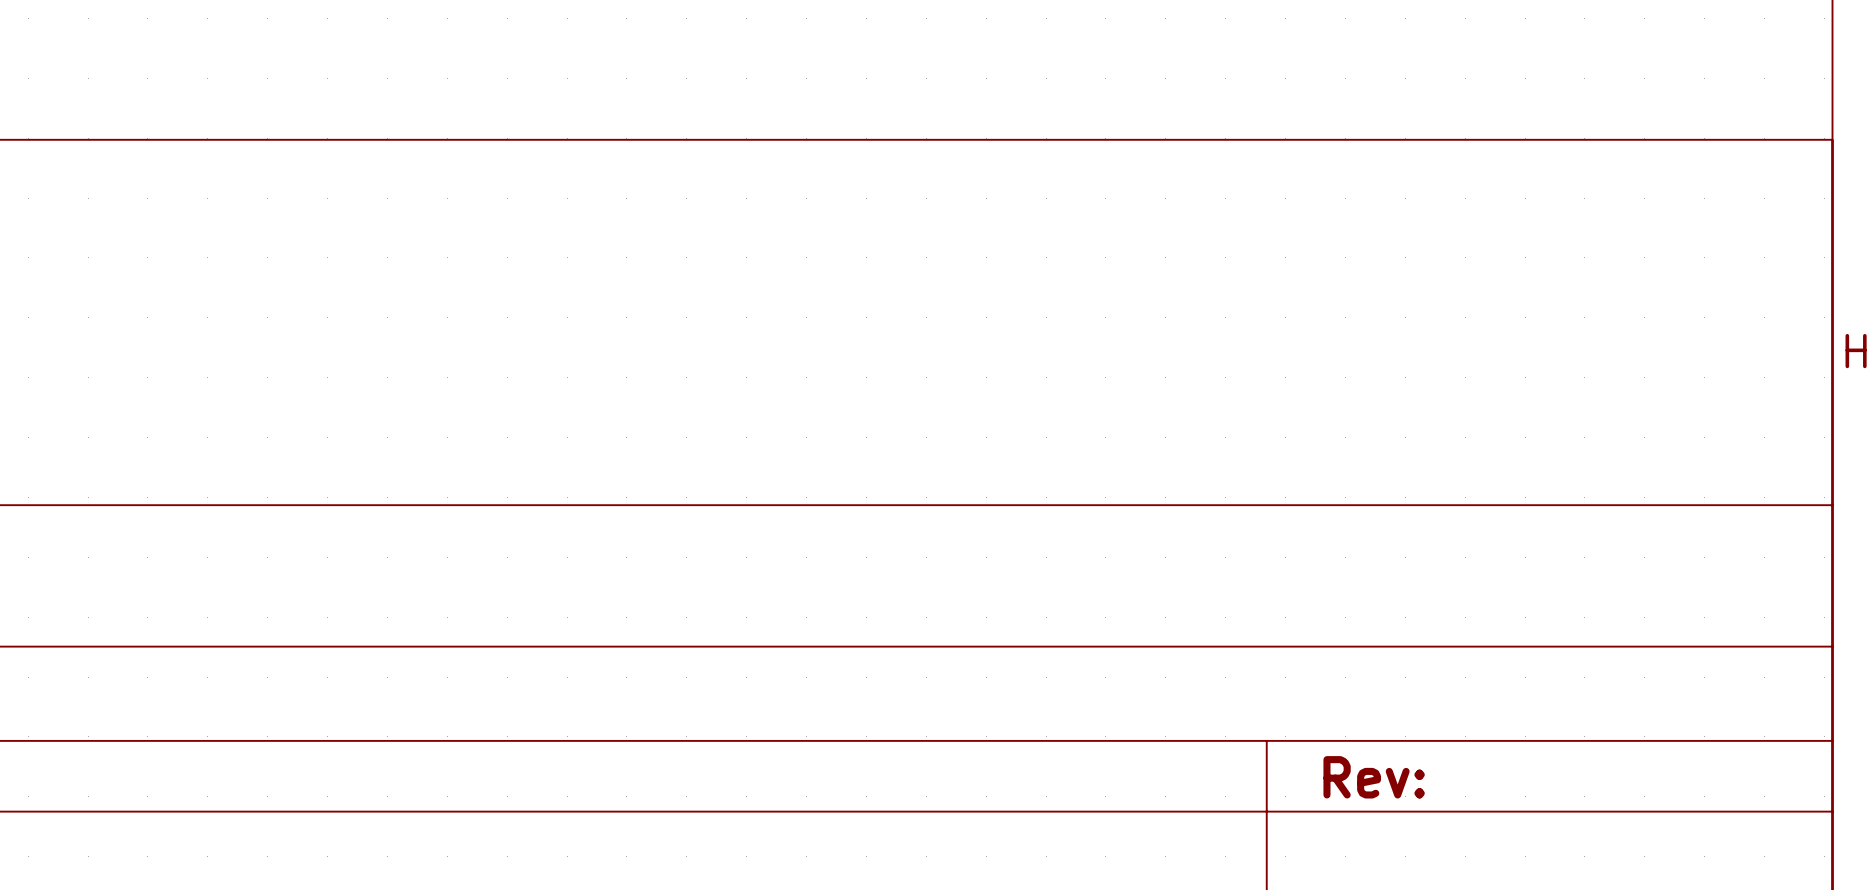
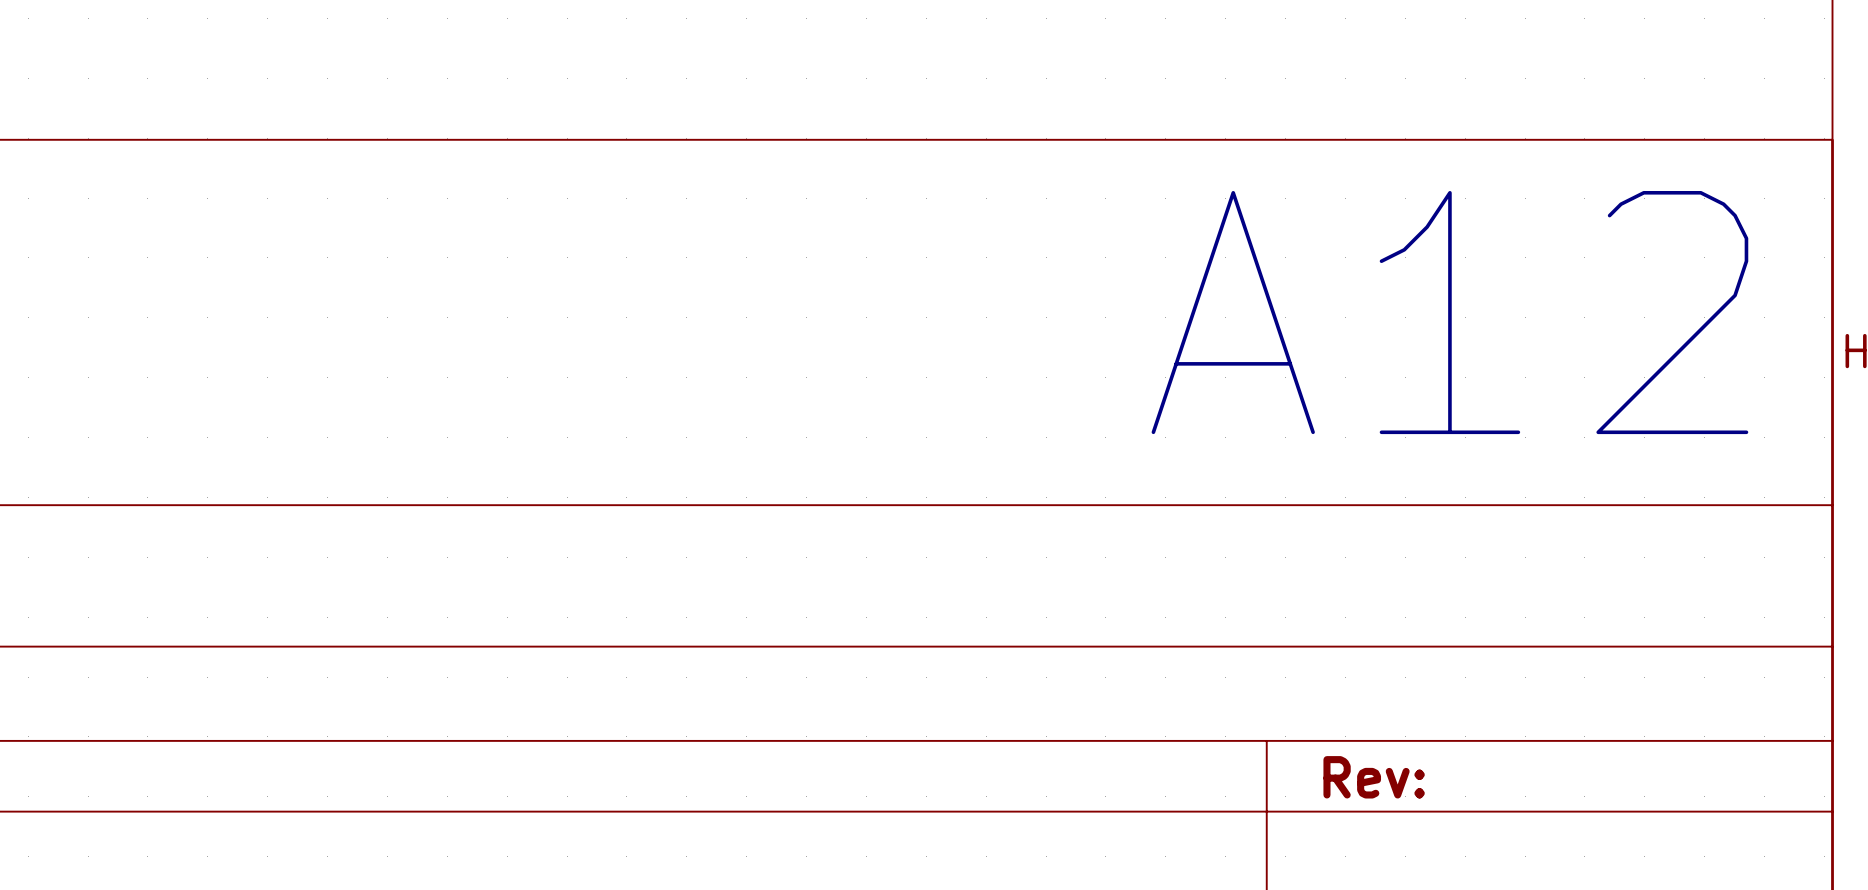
text: none -> A12 (1449, 312)

